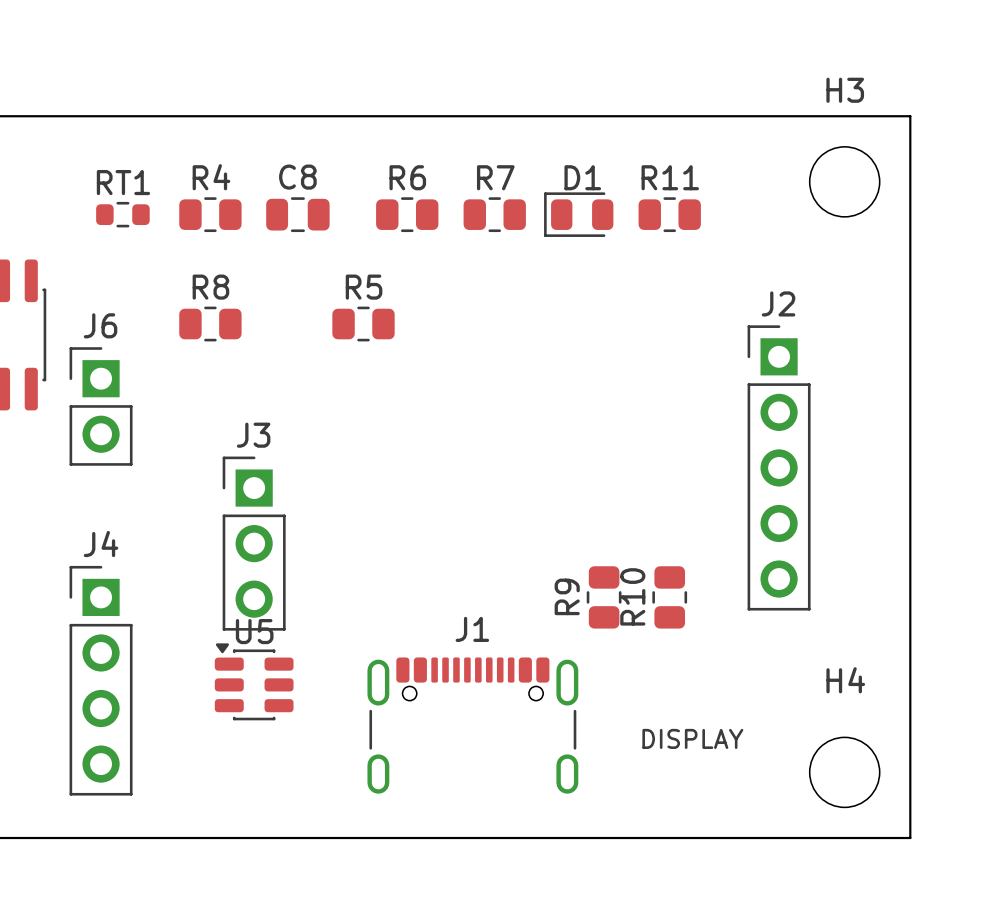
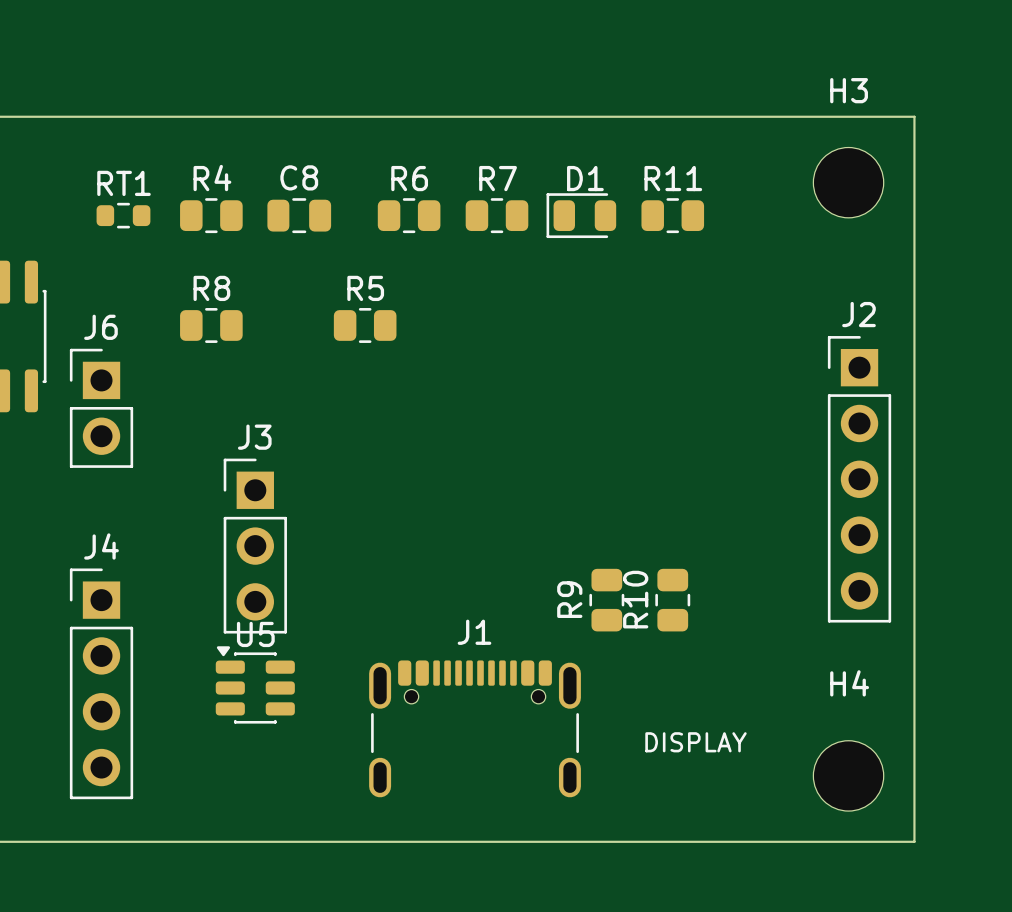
J2 position: (779, 467) -> (859, 479)

